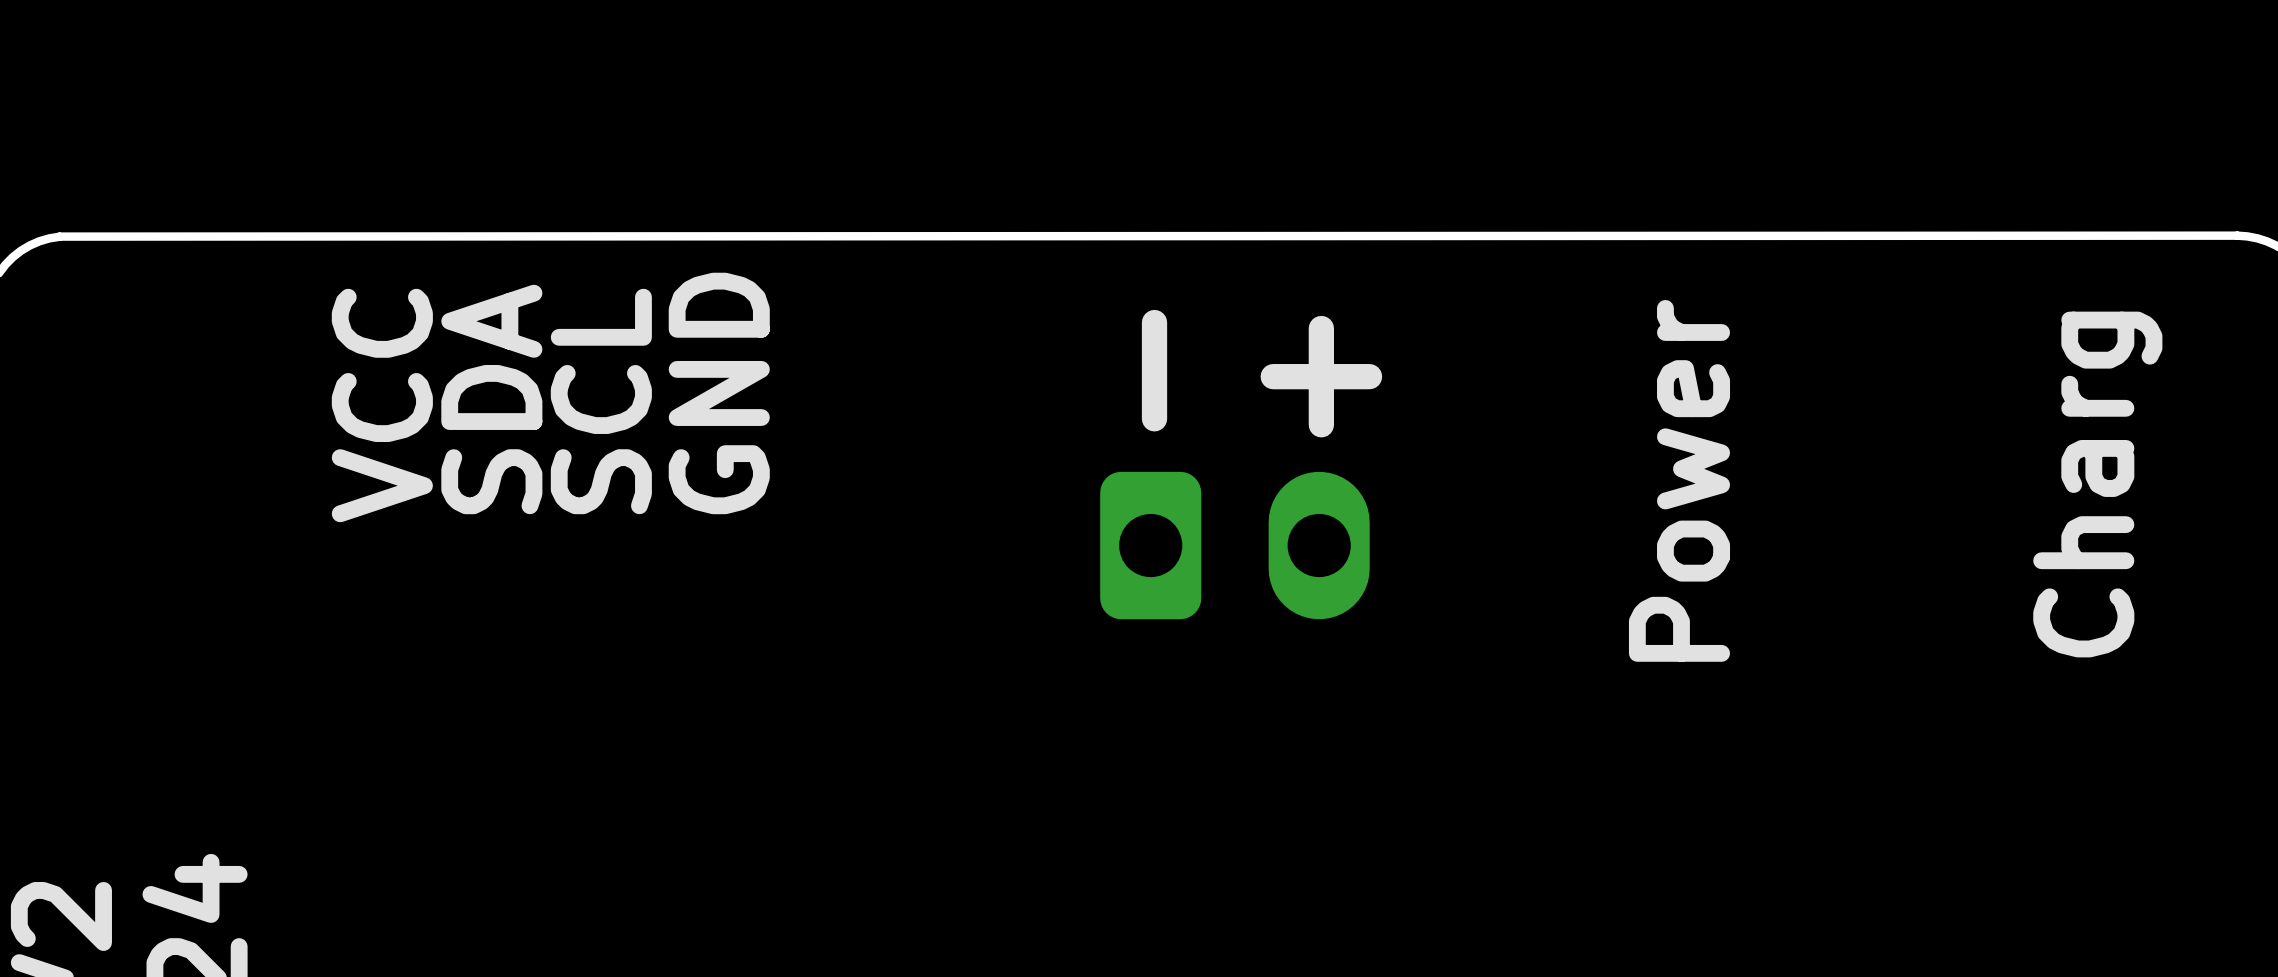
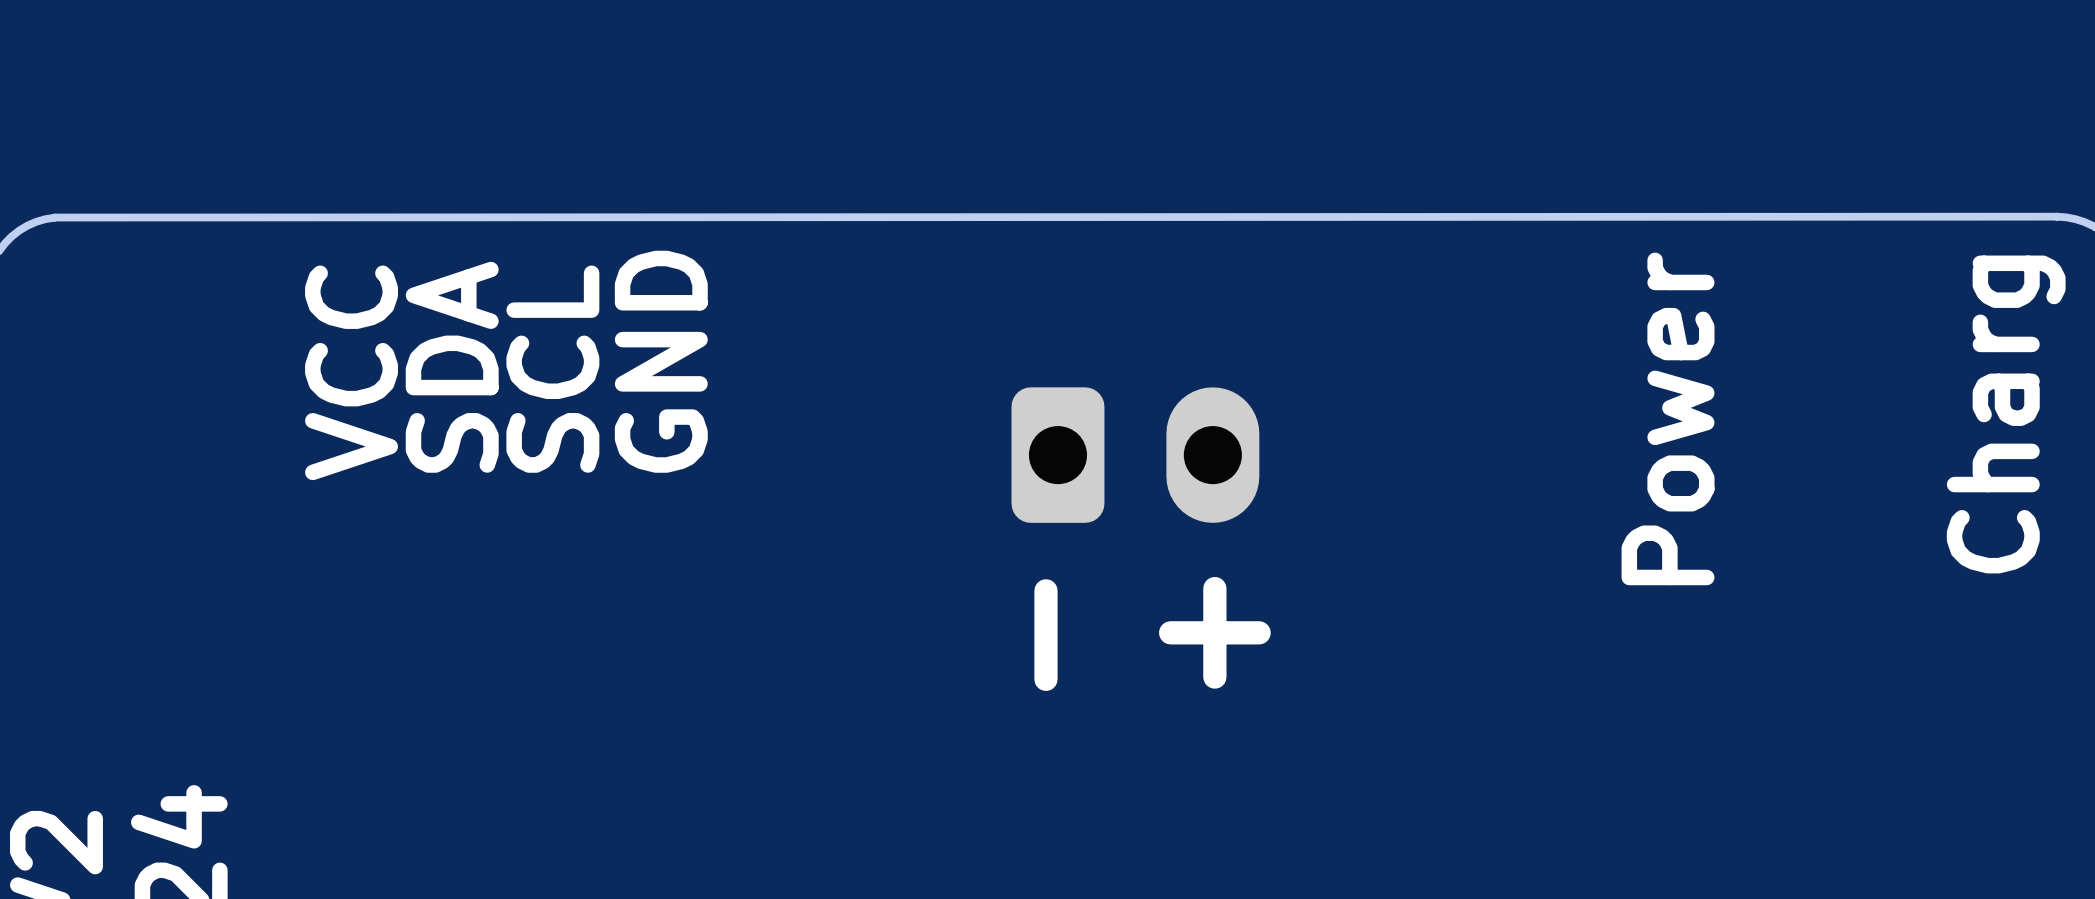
text position: - (1154, 370) -> - (1045, 635)
text position: + (1321, 376) -> + (1214, 632)
text position: Power (1679, 480) -> Power (1668, 418)
text position: Charg (2097, 484) -> Charg (2006, 414)
part position: (1234, 545) -> (1135, 455)

